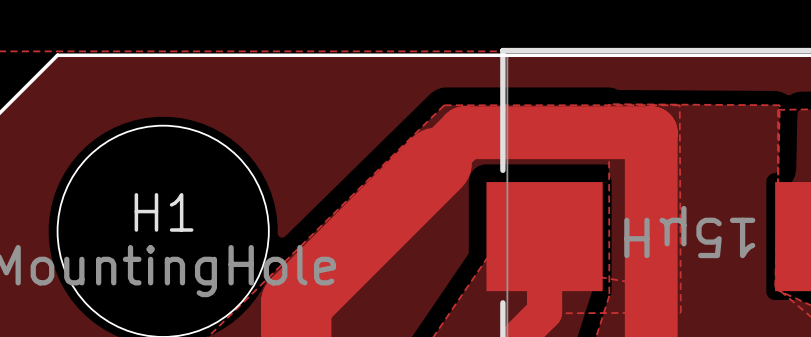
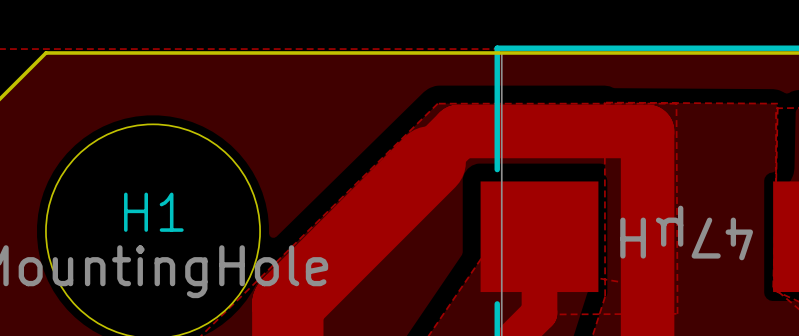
part value: 15μH (689, 232) -> 47μH (686, 232)

